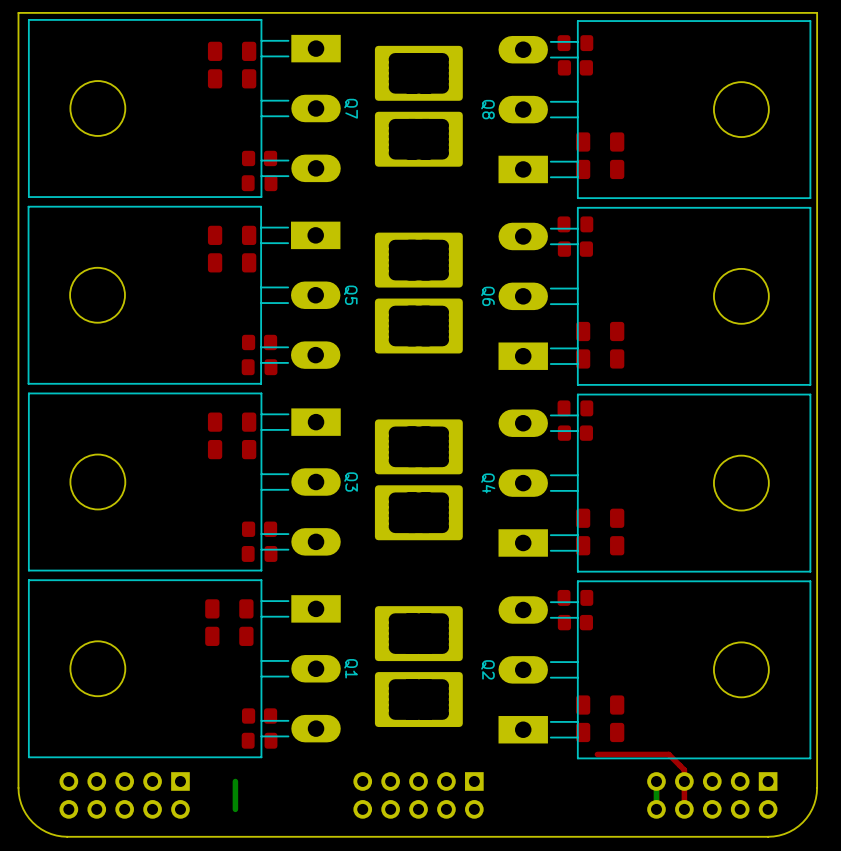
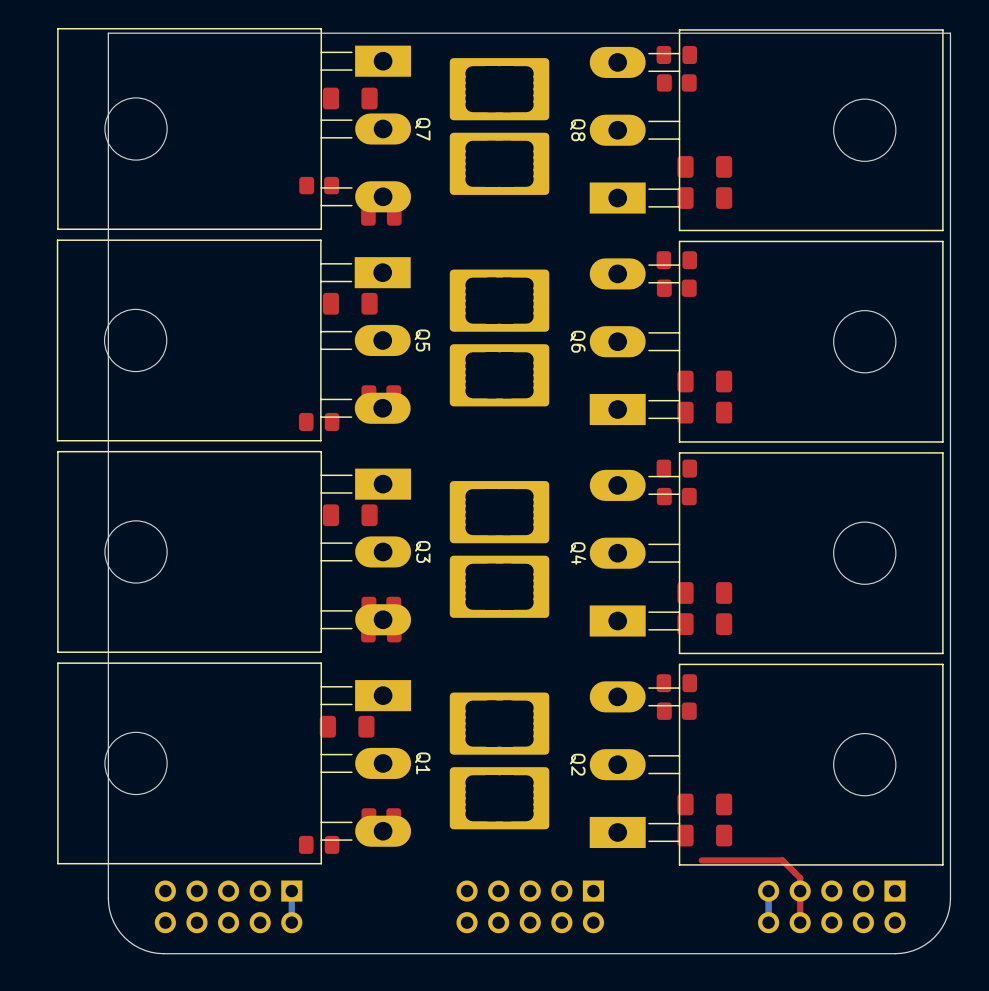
board edge: (817, 23) (817, 12) (18, 12) (18, 793) (25, 813) (32, 822) (46, 831) (61, 836) (122, 836) -> (950, 33) (108, 33) (108, 904) (113, 922) (129, 941) (145, 950) (163, 953)
part: (232, 51) -> none
part: (232, 78) -> none
part: none -> (350, 98)
part position: (259, 183) -> (381, 216)
part: (232, 235) -> none
part: (232, 262) -> none
part: none -> (350, 303)
part position: (259, 342) -> (381, 393)
part: (232, 422) -> none
part: (232, 449) -> none
part: none -> (350, 515)
part position: (259, 529) -> (381, 605)
part position: (259, 553) -> (381, 633)
part: (229, 608) -> none
part: (229, 636) -> none
part: none -> (347, 726)
part position: (259, 716) -> (381, 816)
part position: (124, 795) -> (228, 906)
part position: (418, 795) -> (530, 906)

